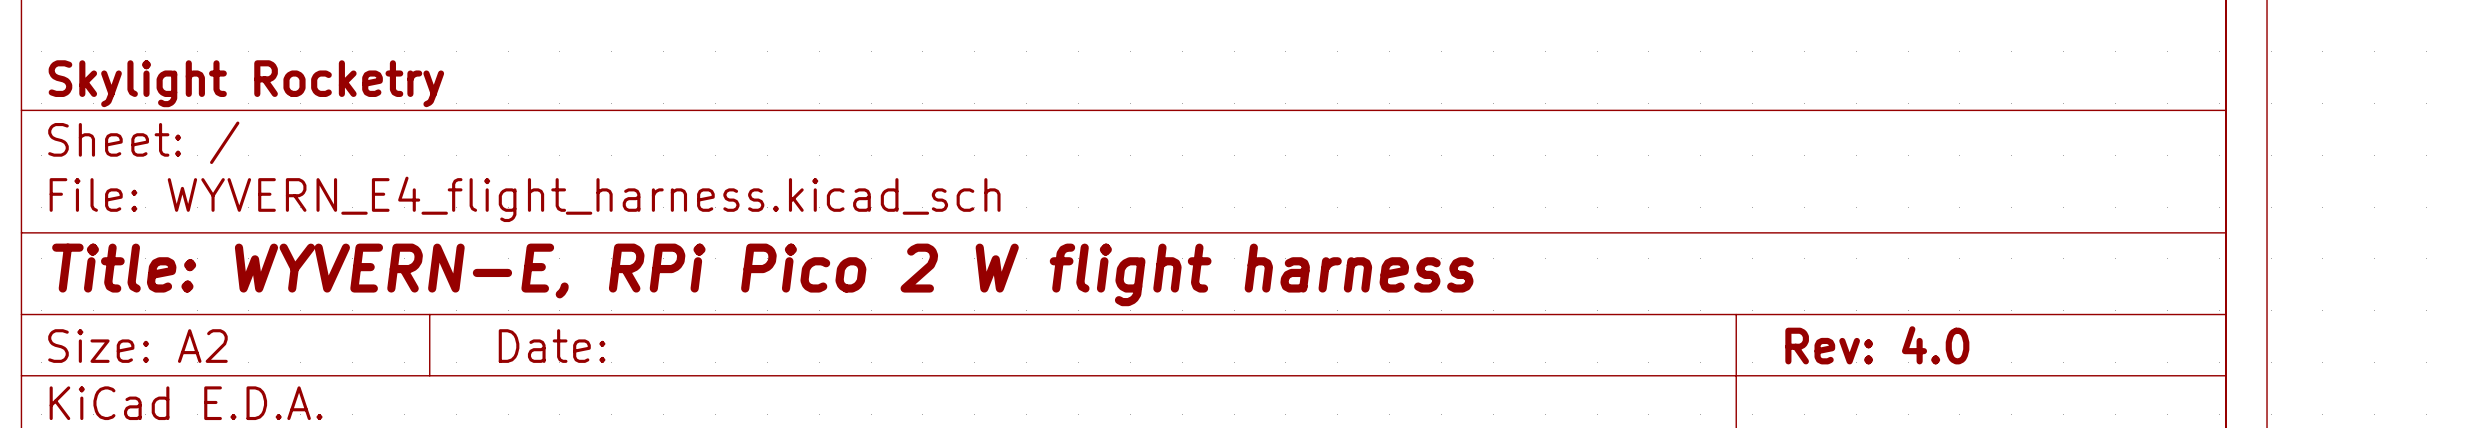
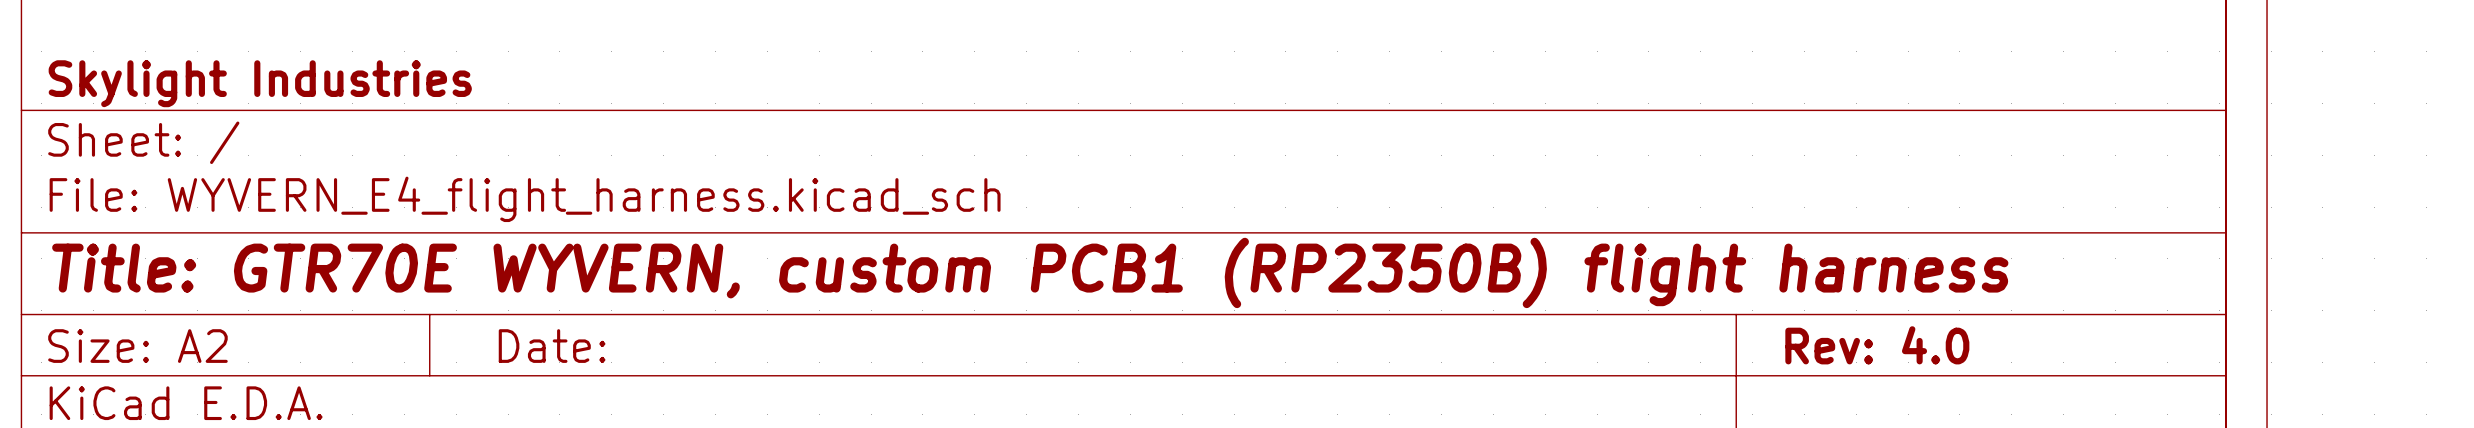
title block: Skylight Rocketry (246, 83) -> Skylight Industries (260, 83)
title block: Title: WYVERN-E, RPi Pico 2 W flight harness (762, 274) -> Title: GTR70E WYVERN, custom PCB1 (RP2350B) flight harness (1030, 272)

